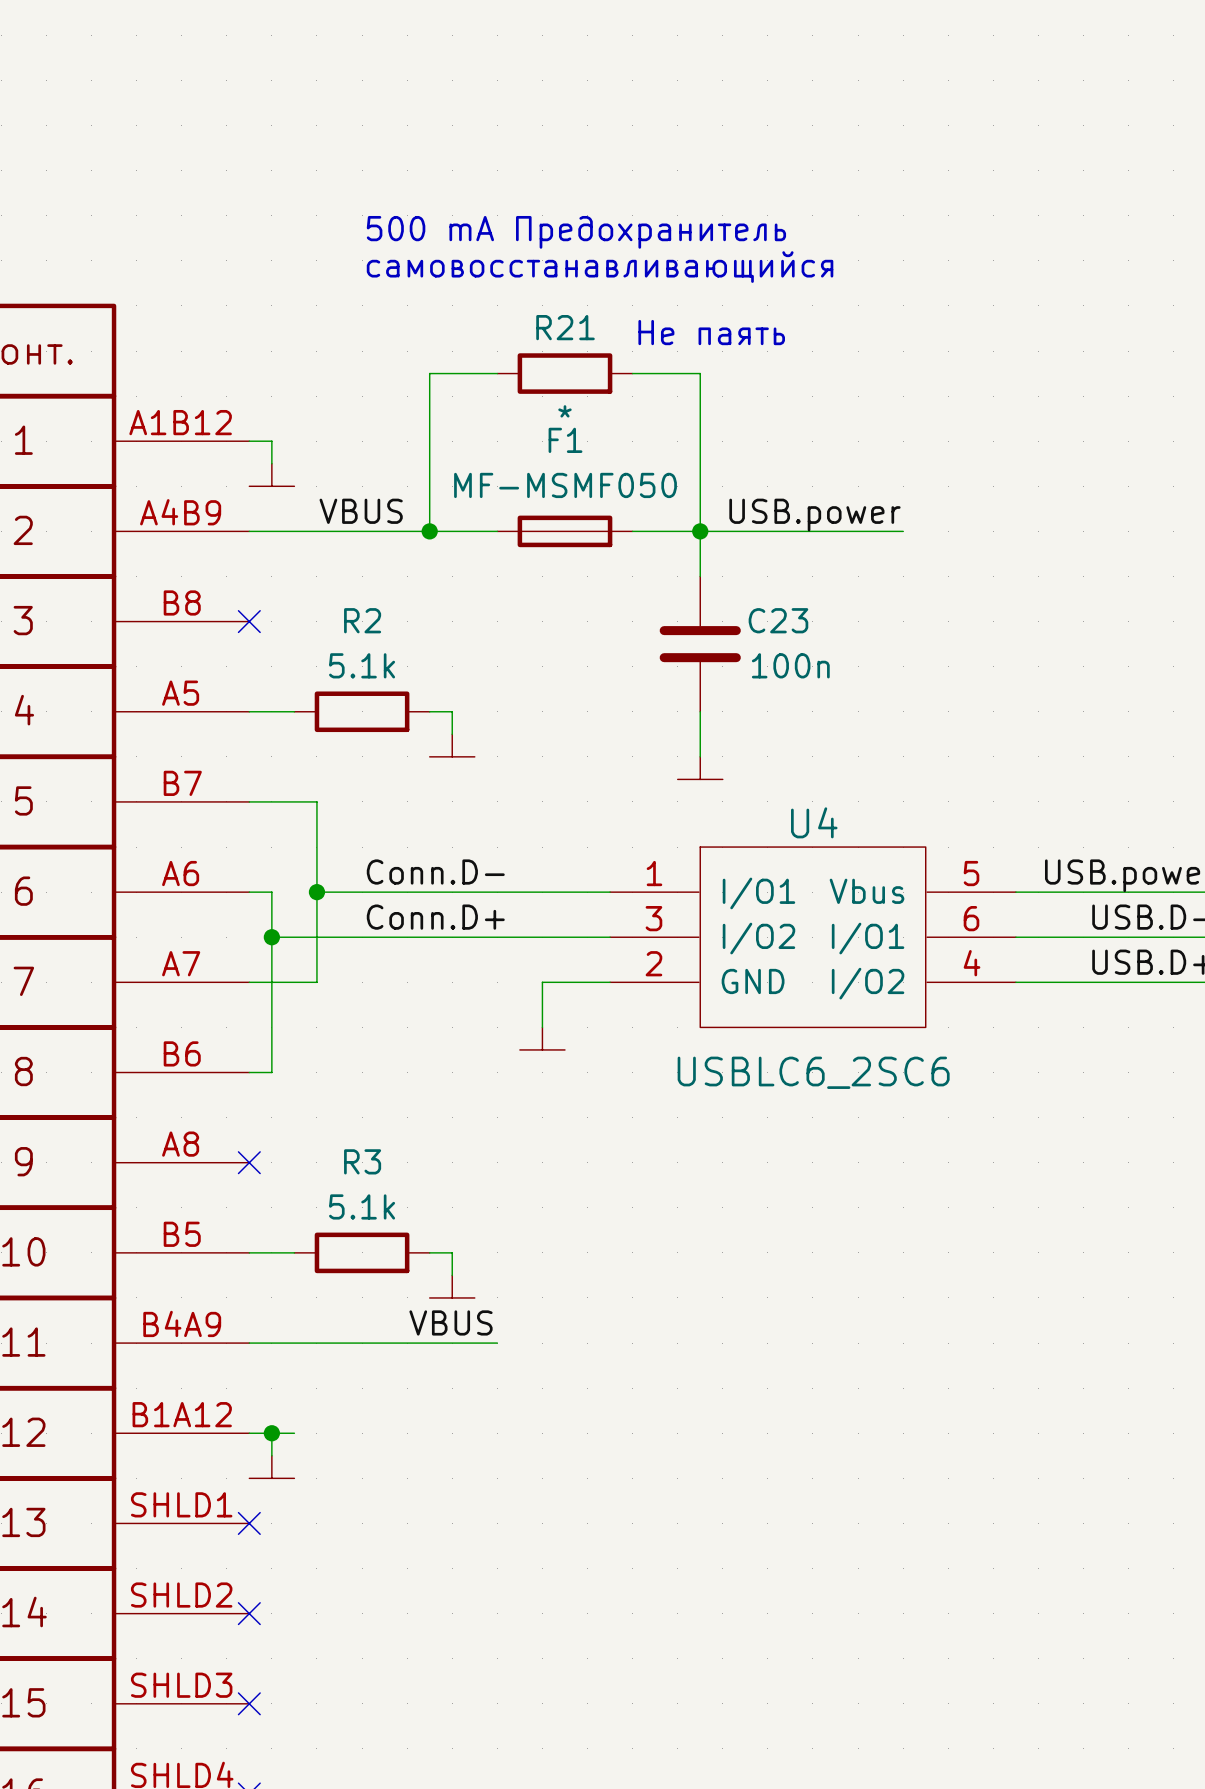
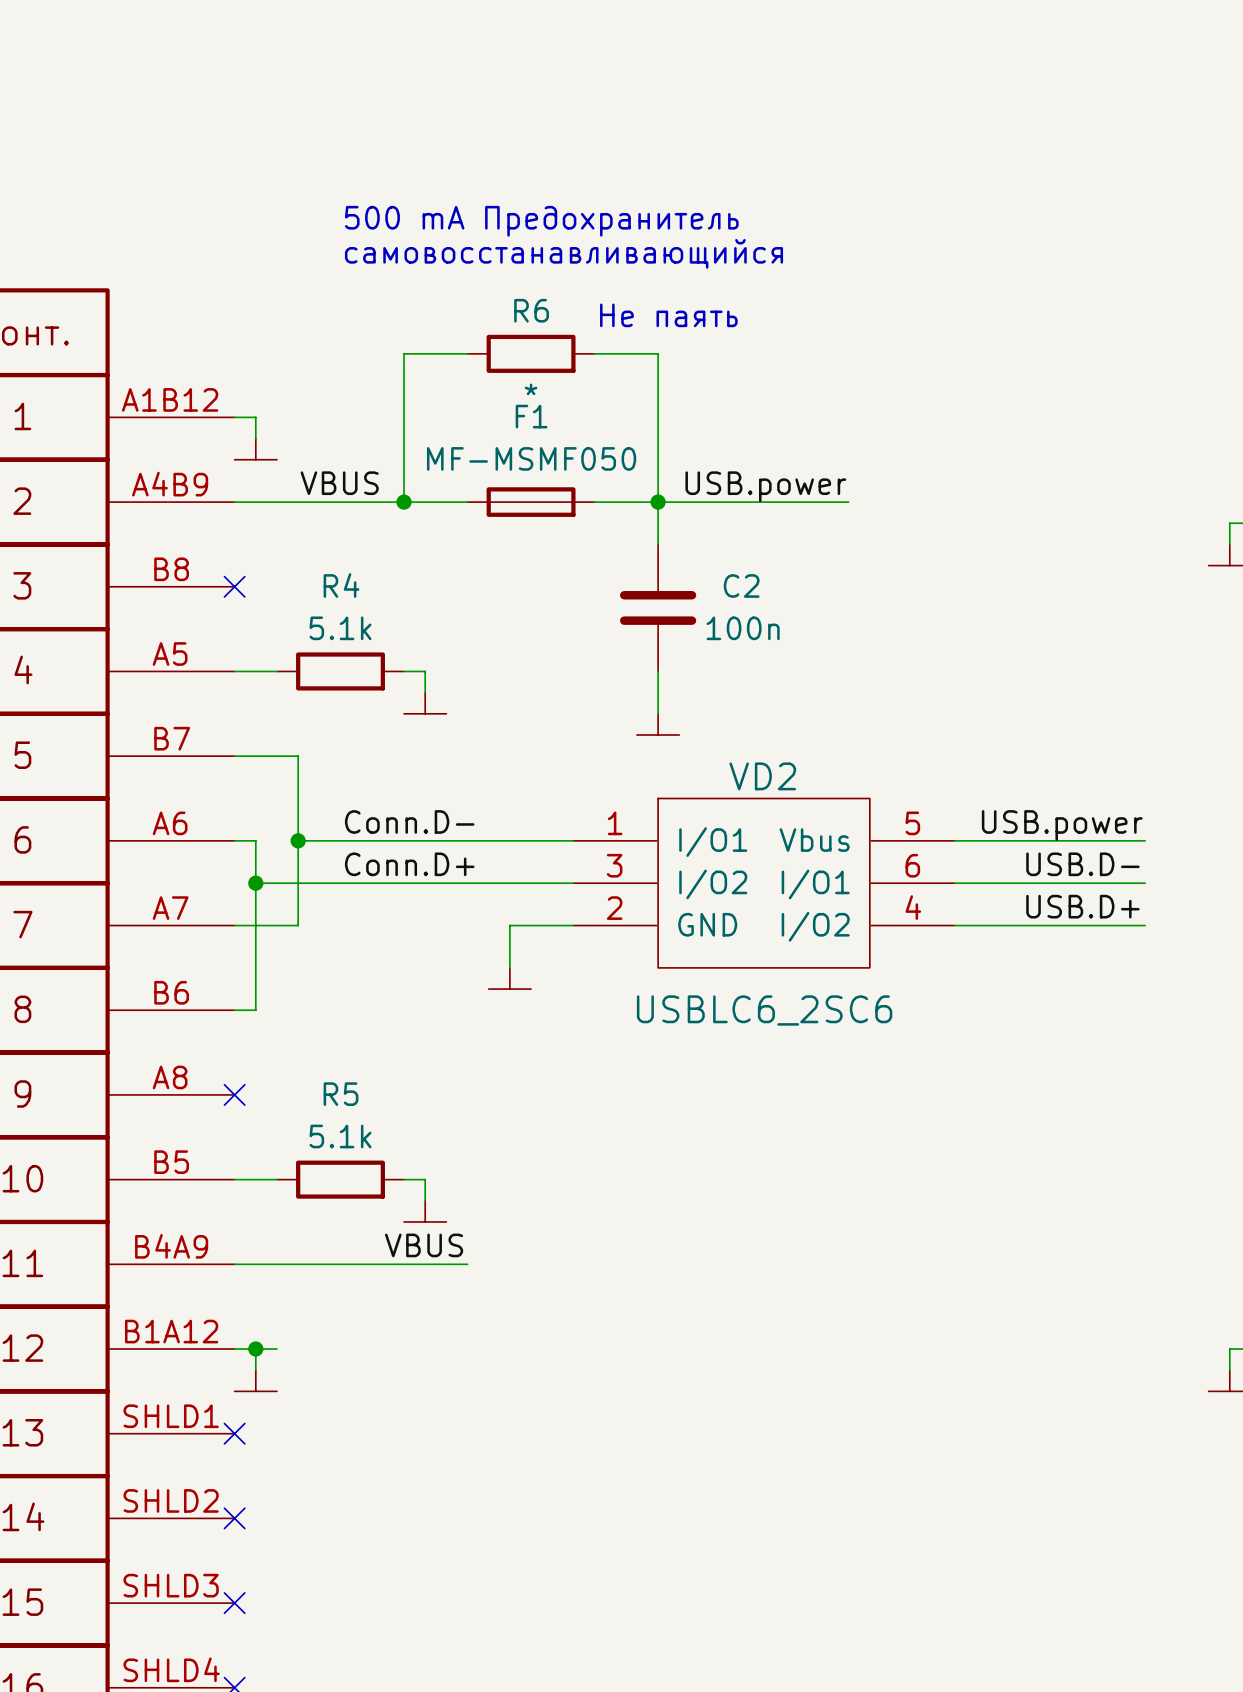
R21 name: R21 (565, 327) -> R6 (531, 310)
R2 name: R2 (362, 620) -> R4 (341, 585)
C23 name: C23 (778, 620) -> C2 (741, 585)
U4 name: U4 (814, 822) -> VD2 (762, 776)
R3 name: R3 (362, 1161) -> R5 (341, 1094)

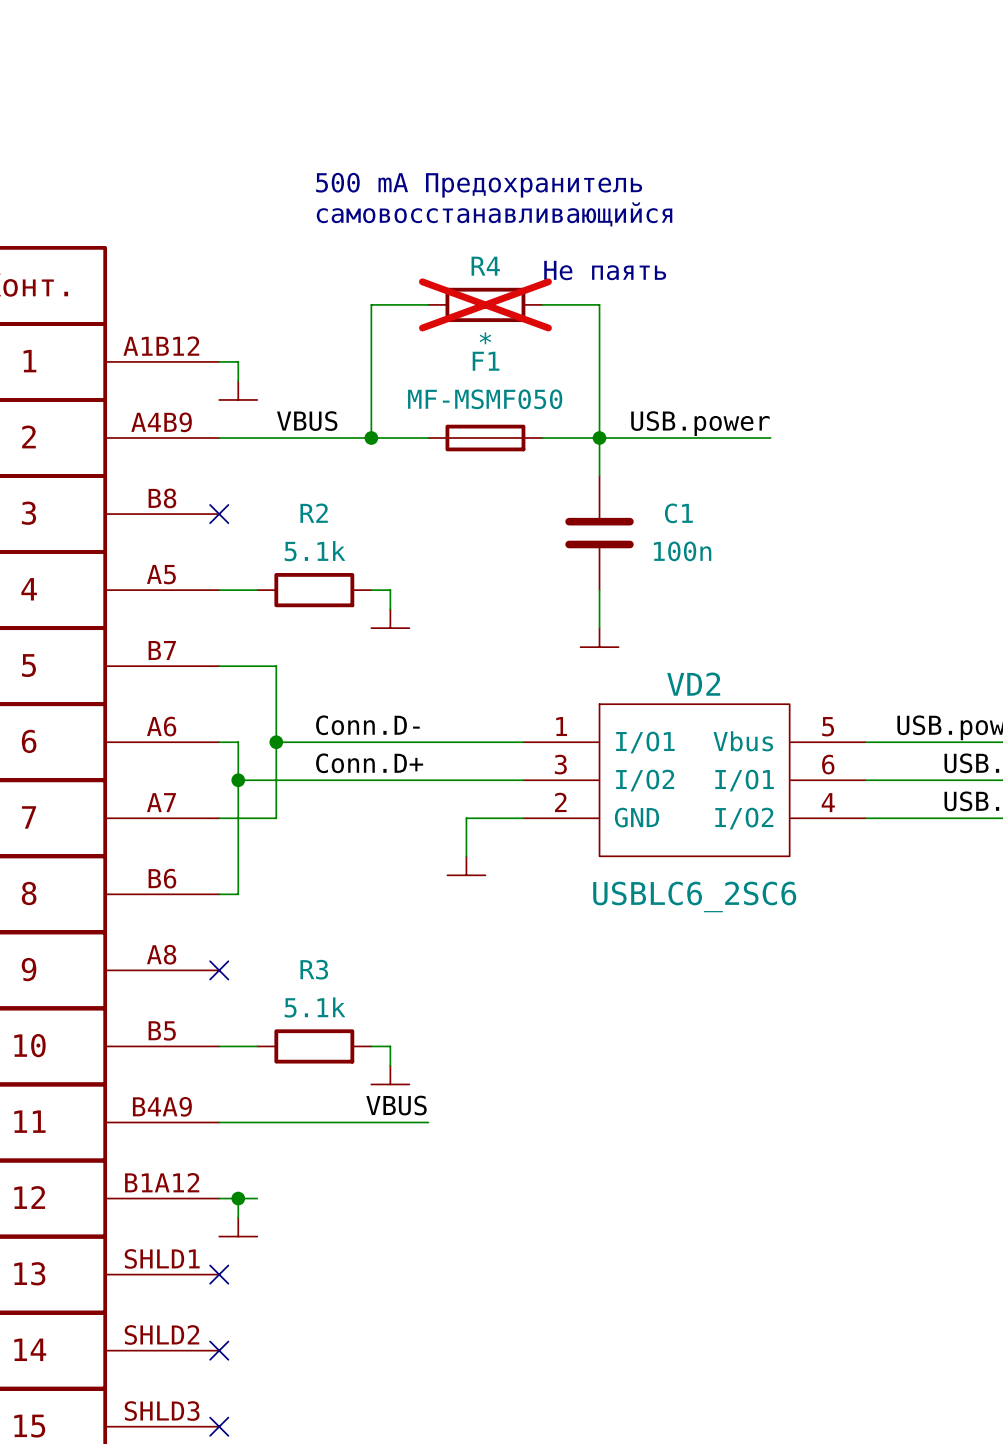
R6 name: R6 (531, 310) -> R4 (485, 266)
R6 do-not-place cross: none -> (485, 304)
R4 name: R4 (341, 585) -> R2 (314, 513)
C2 name: C2 (741, 585) -> C1 (678, 513)
R5 name: R5 (341, 1094) -> R3 (314, 969)

